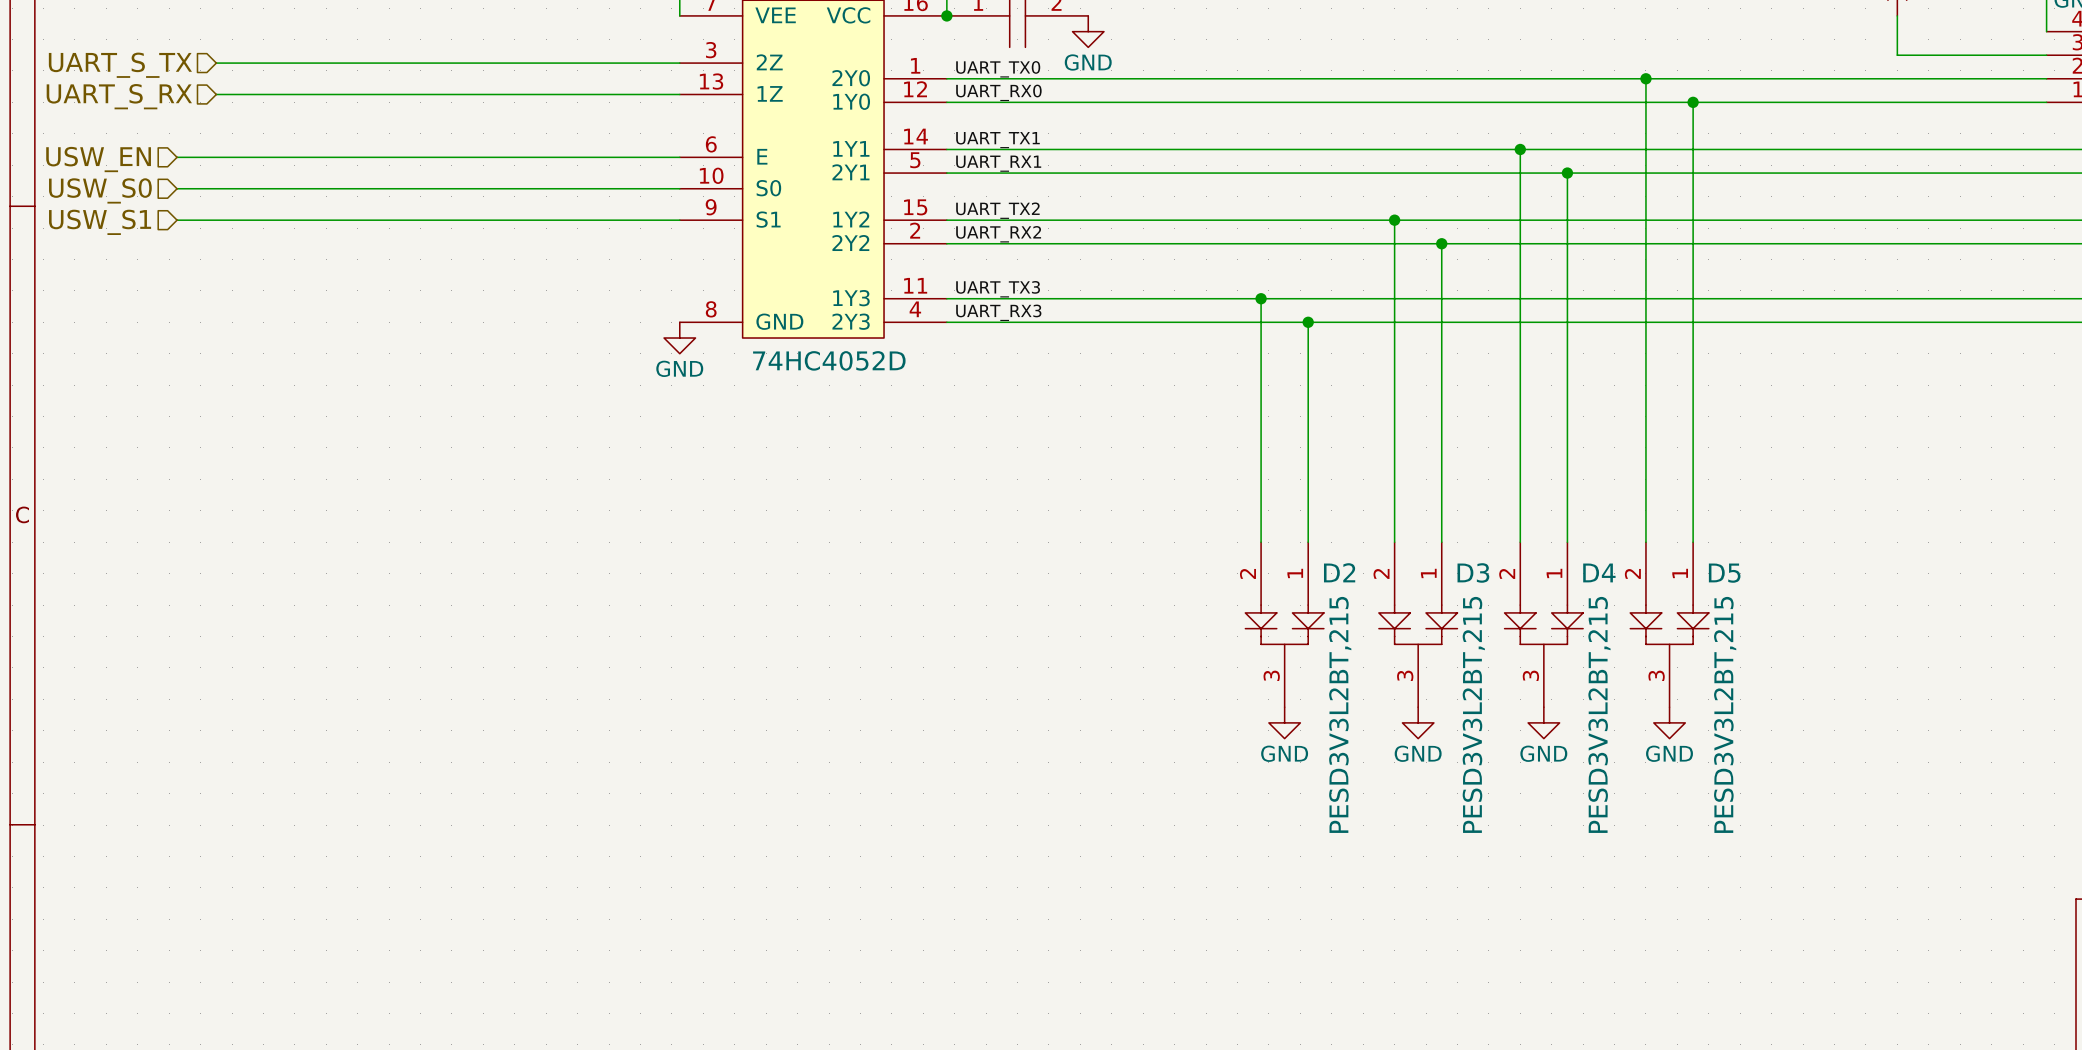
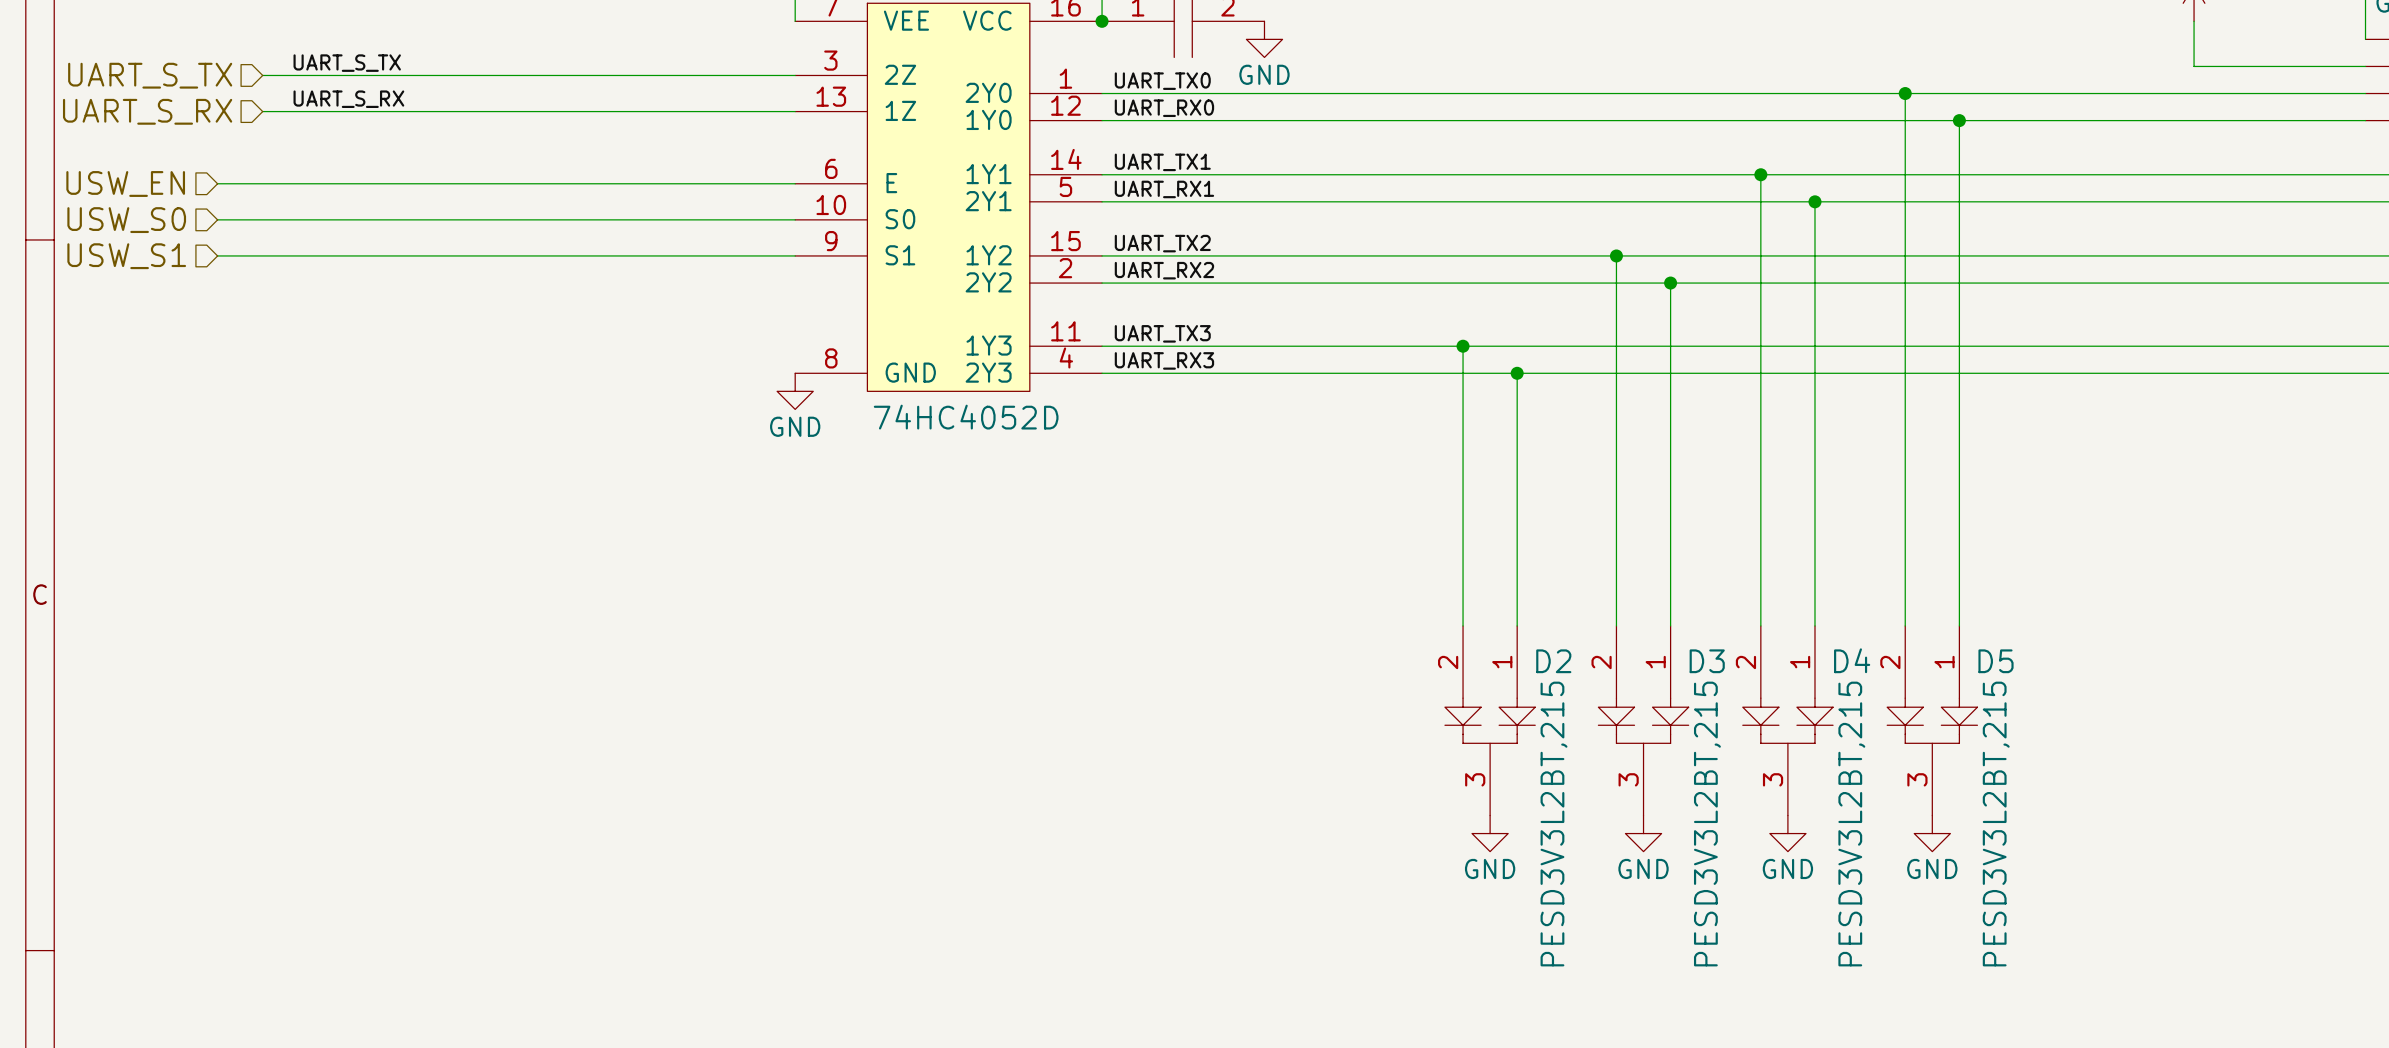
label: none -> UART_S_TX (347, 63)
label: none -> UART_S_RX (348, 99)

